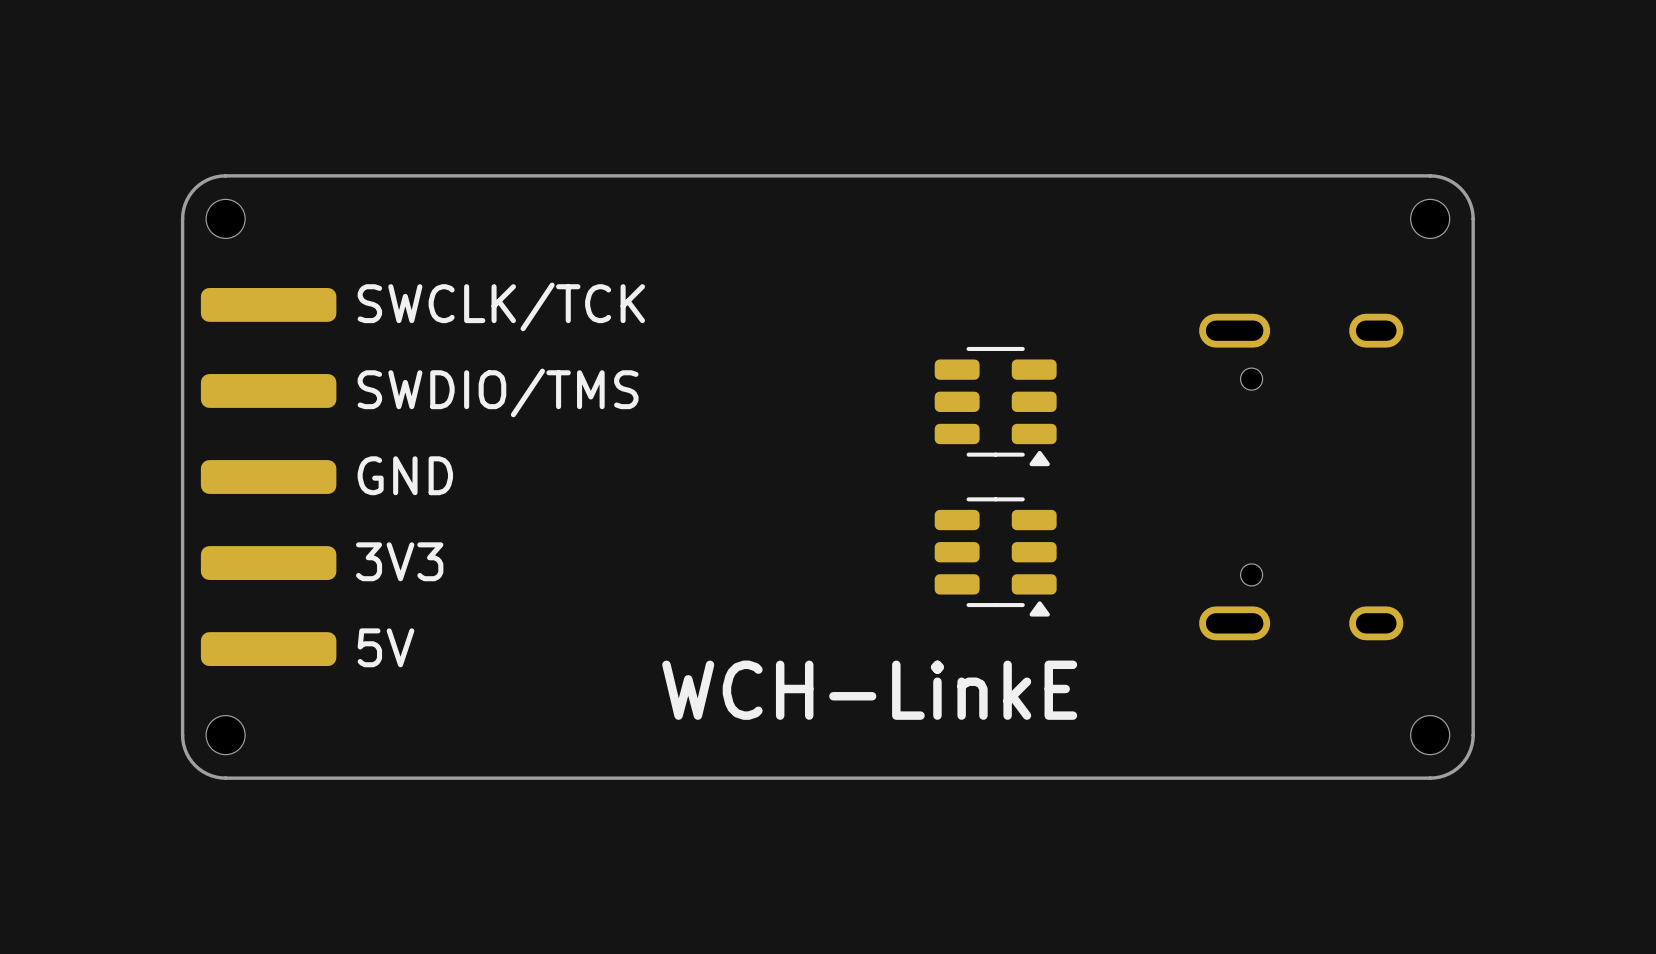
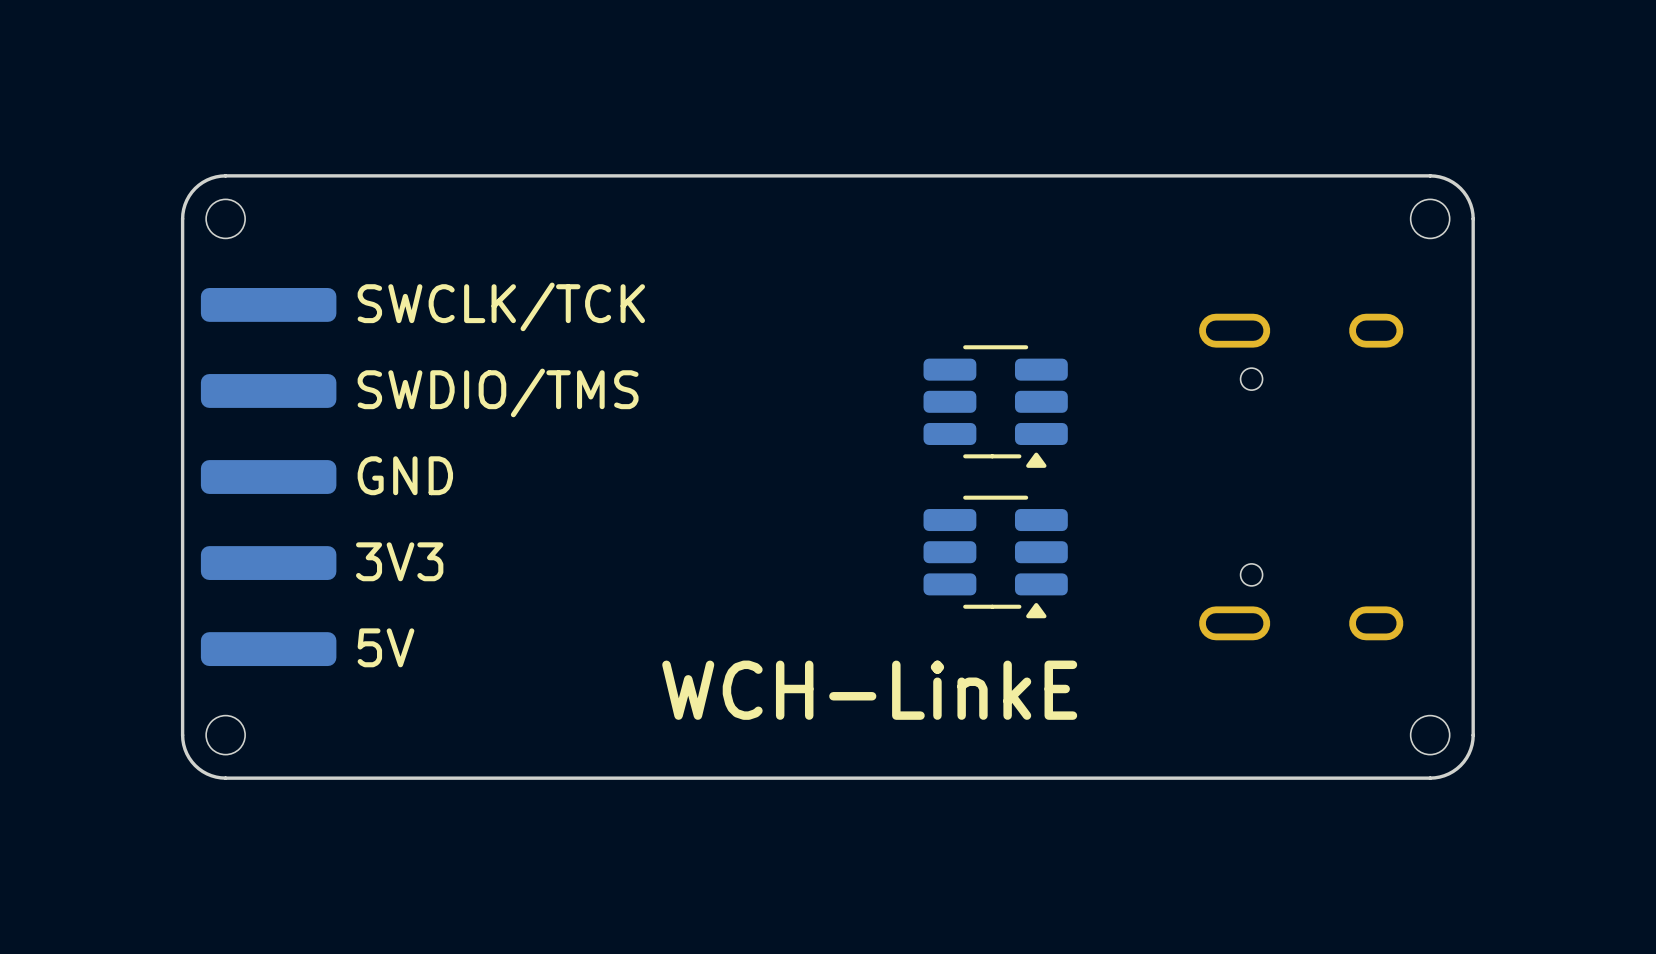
part footprint: [934, 346, 1057, 467] -> [923, 345, 1068, 468]
part footprint: [934, 497, 1057, 617] -> [923, 495, 1068, 619]

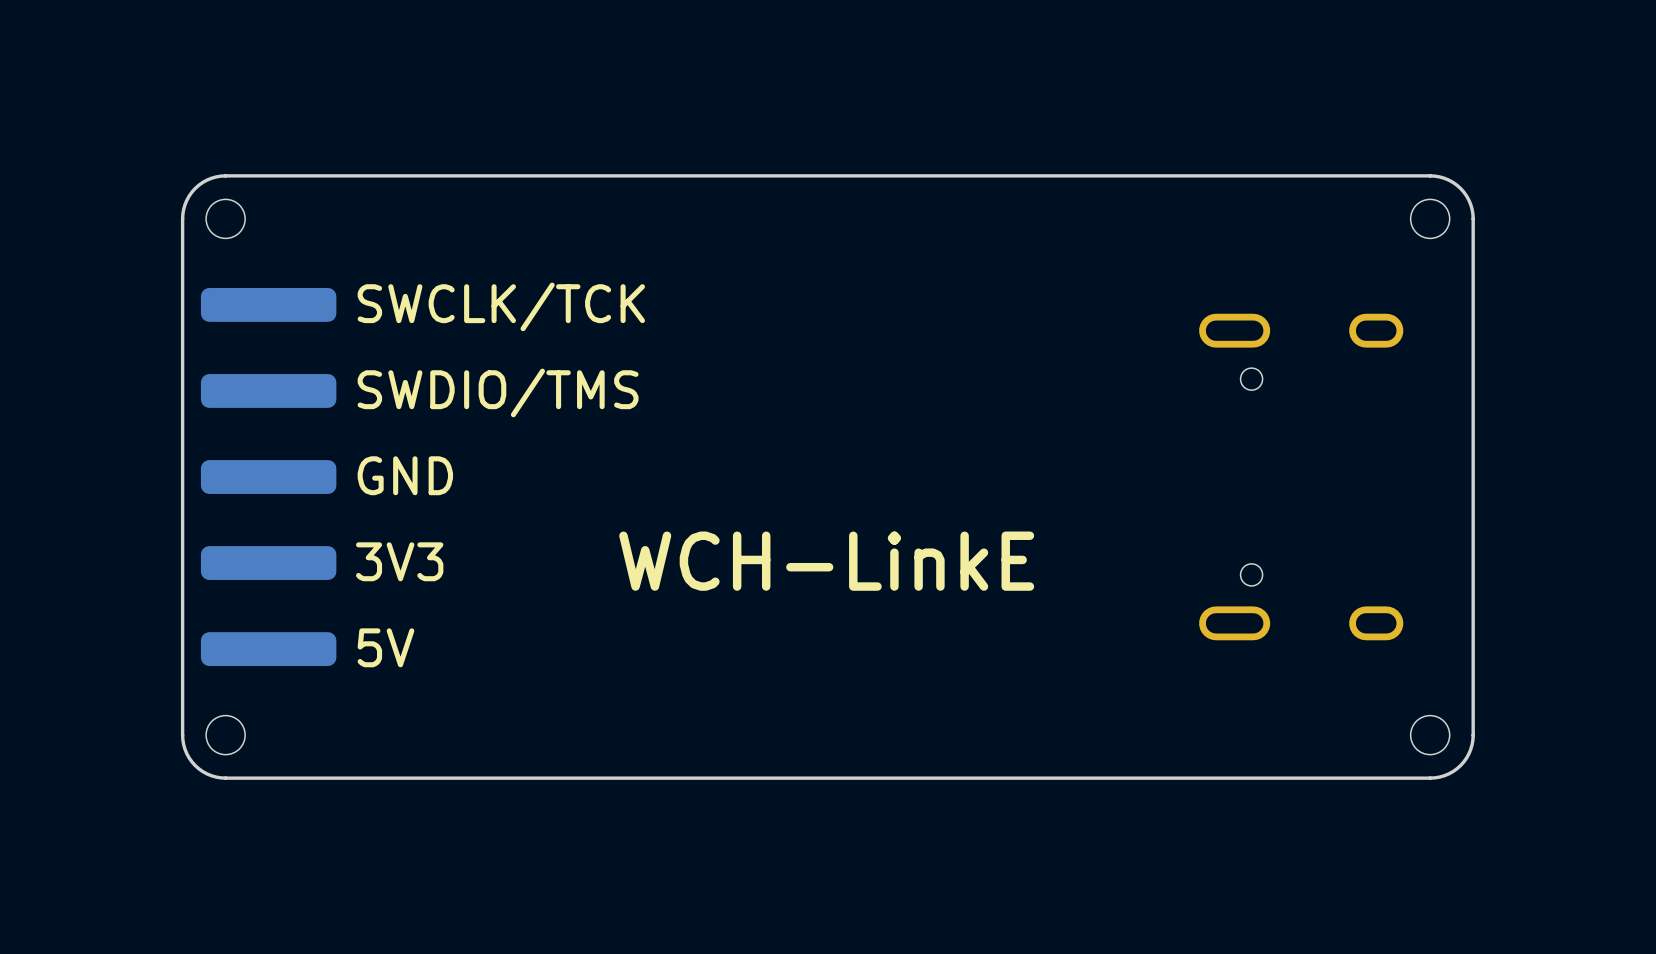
part: (995, 406) -> none
part: (995, 556) -> none
text position: WCH-LinkE (869, 690) -> WCH-LinkE (826, 561)

